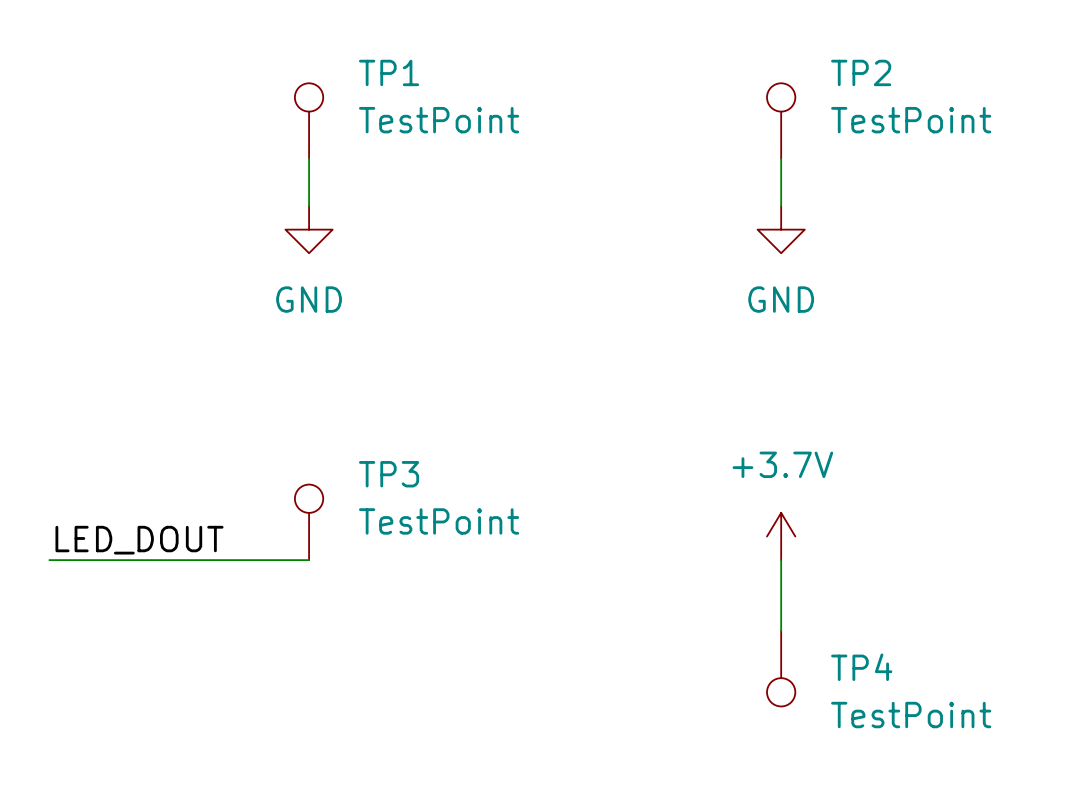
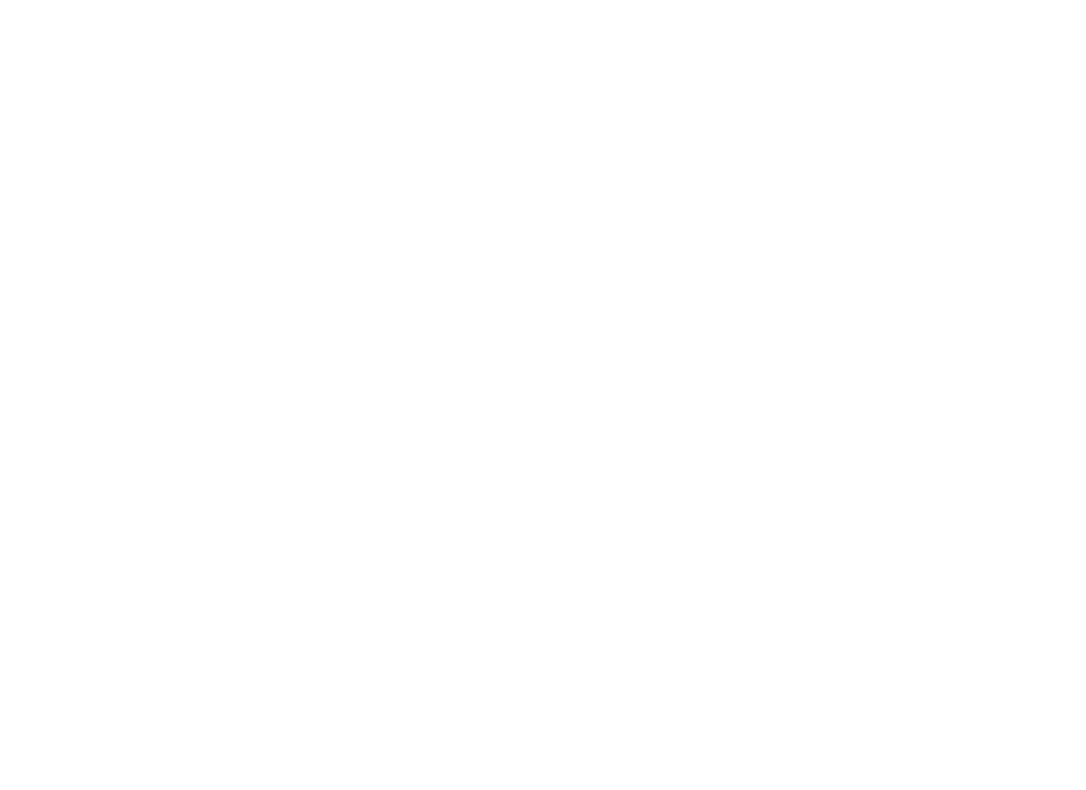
TP1: TestPoint (309, 121) -> none
TP2: TestPoint (781, 121) -> none
wire: (309, 158) (309, 206) -> none
wire: (781, 158) (781, 206) -> none
power symbol: GND (309, 229) -> none
power symbol: GND (781, 229) -> none
TP3: TestPoint (309, 522) -> none
power symbol: +3.7V (781, 536) -> none
label: LED_DOUT (139, 540) -> none
wire: (49, 560) (309, 560) -> none
wire: (781, 560) (781, 630) -> none
TP4: TestPoint (781, 668) -> none

